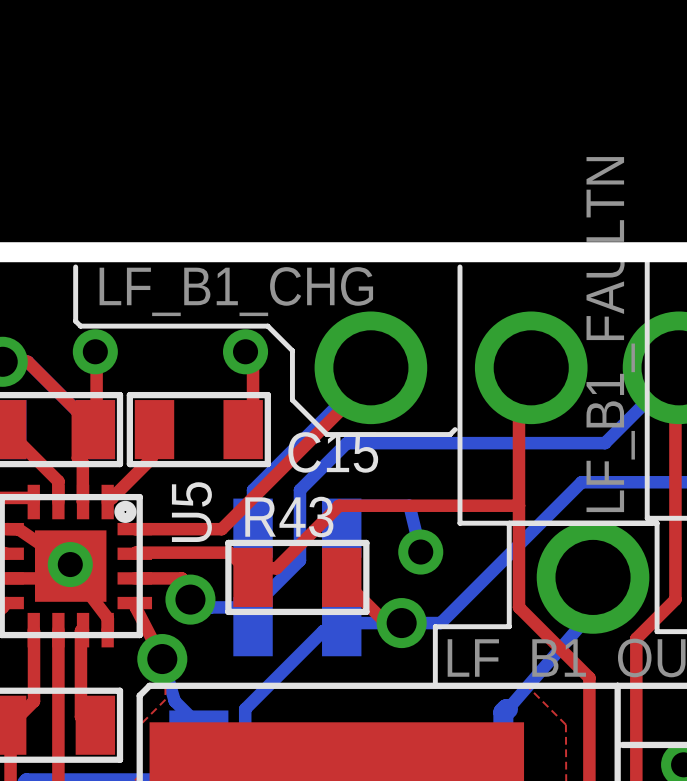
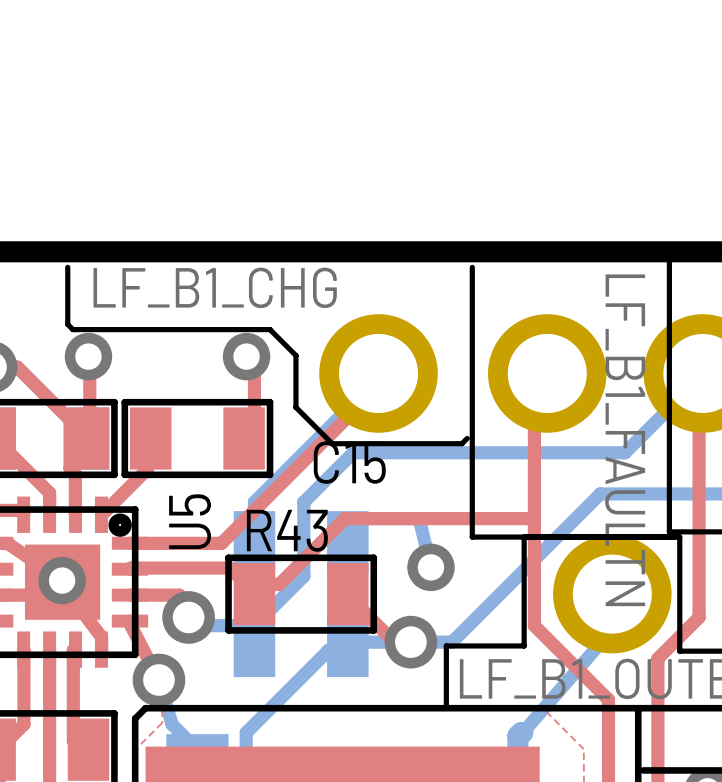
part value rotation: 0° (610, 334) -> 180° (625, 440)

